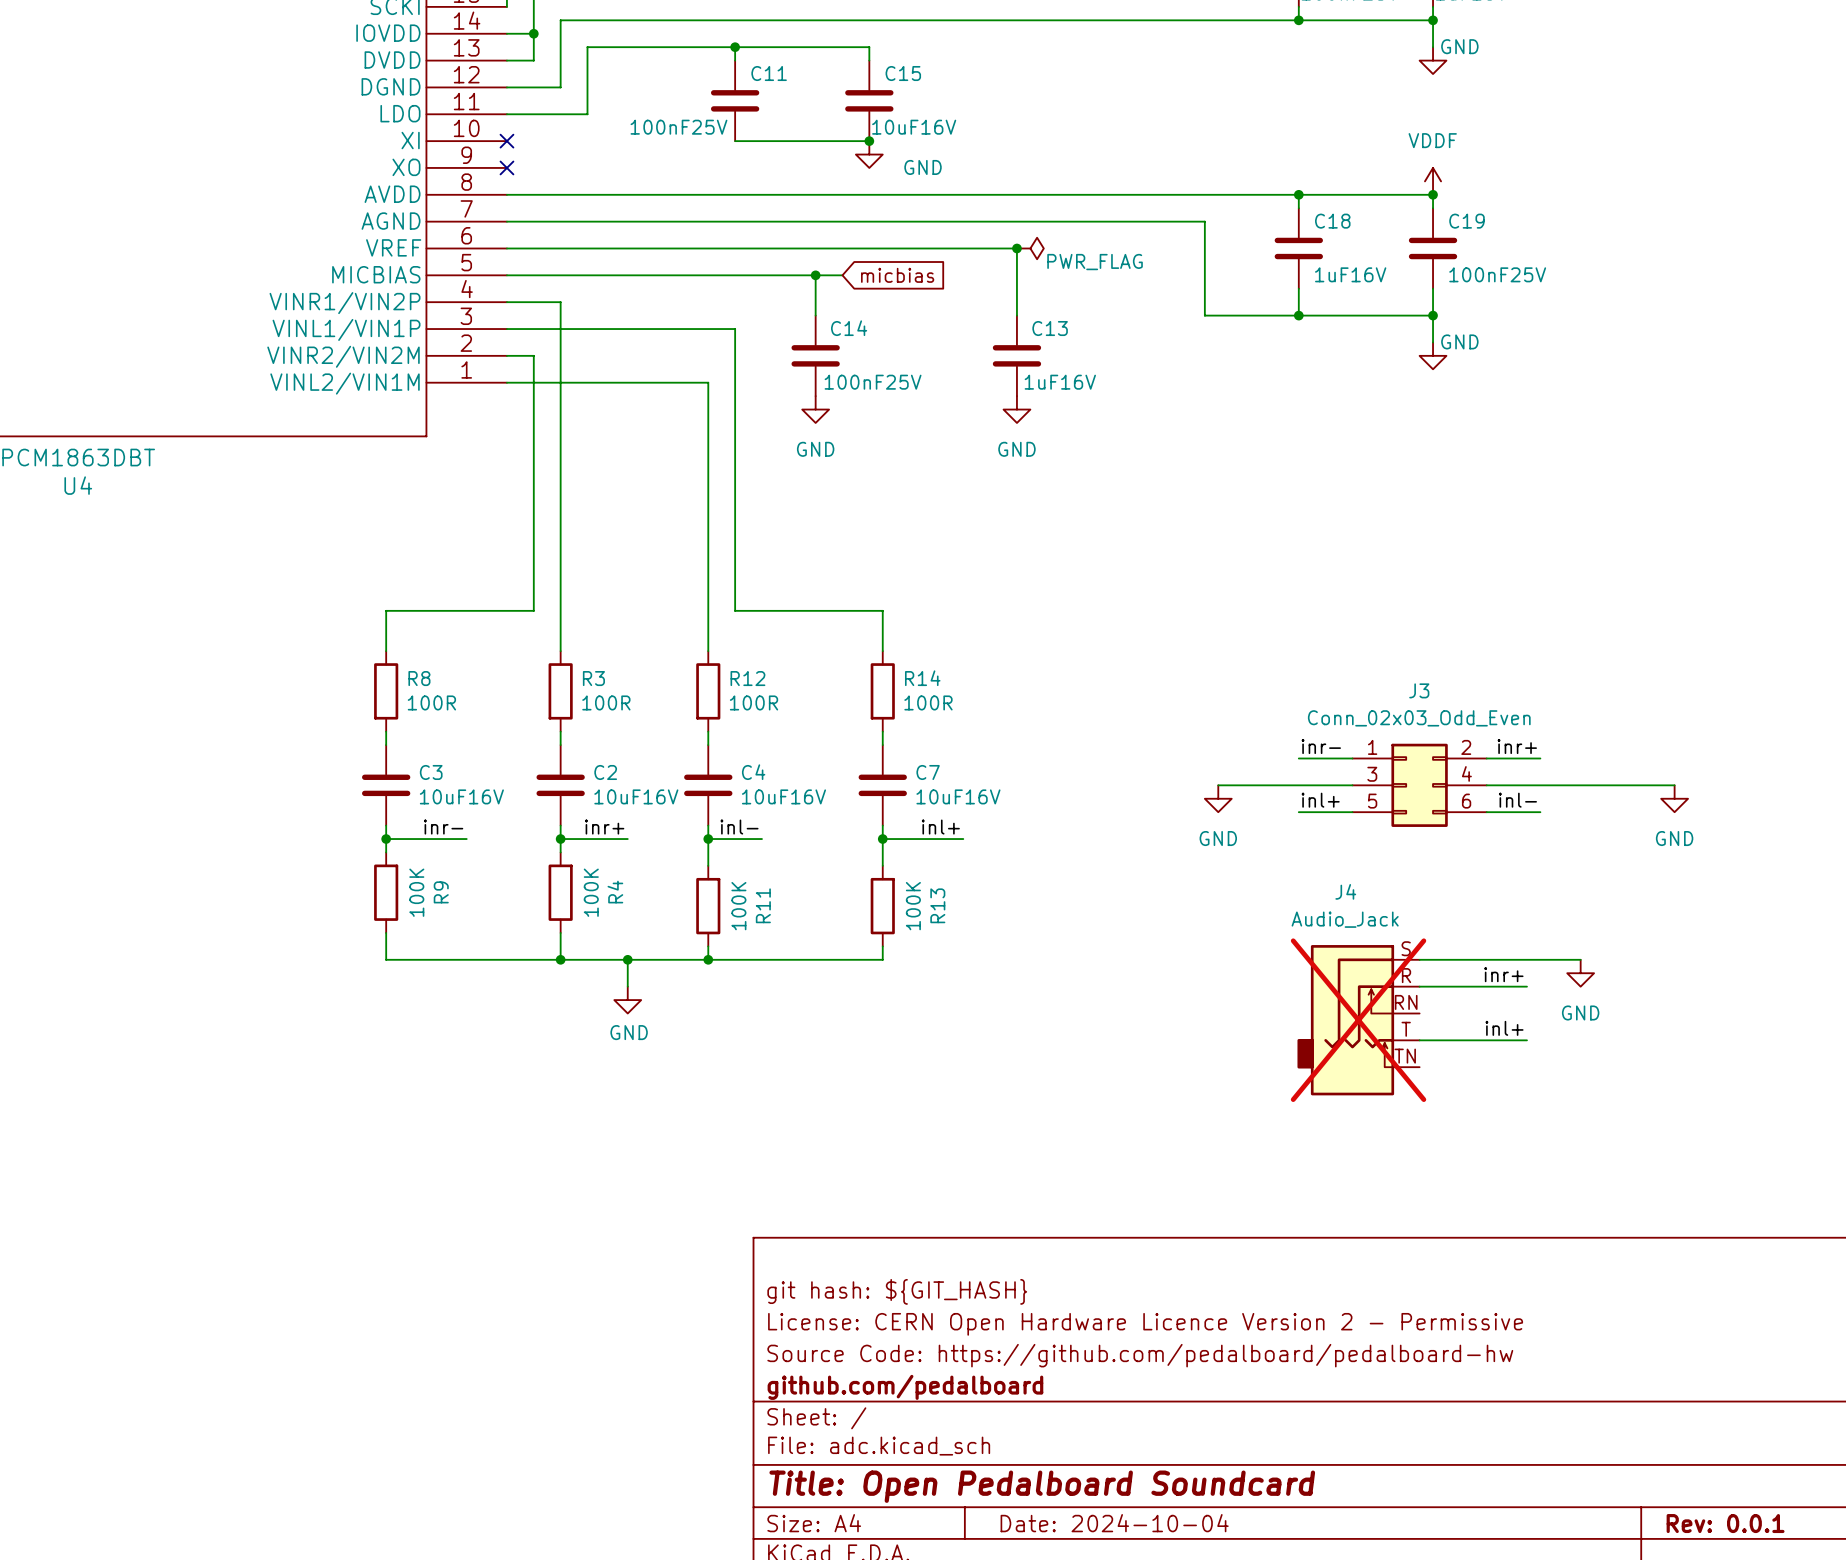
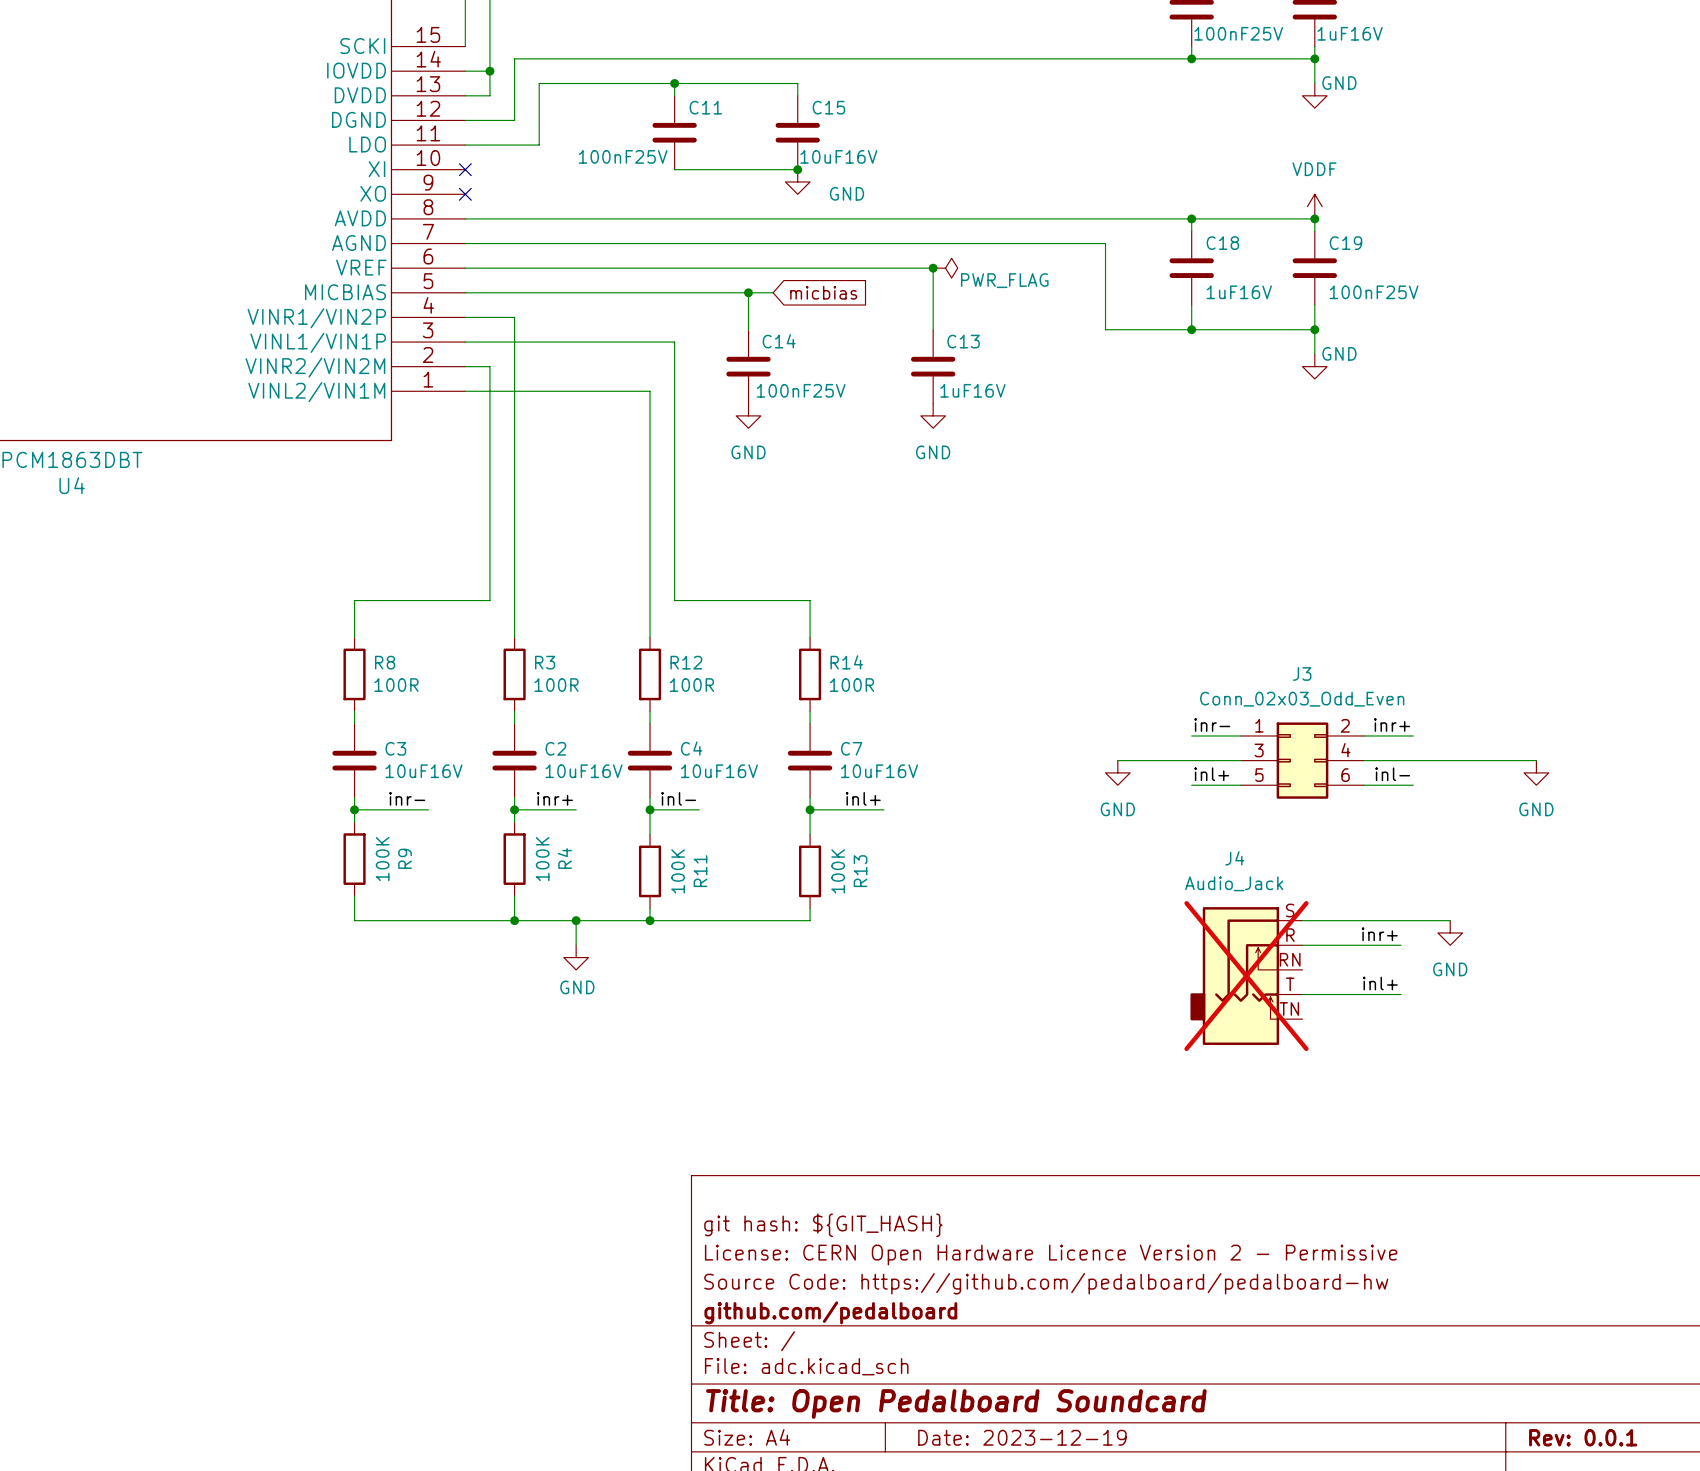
title block: Date: 2024-10-04 (1114, 1523) -> Date: 2023-12-19 (1022, 1437)

